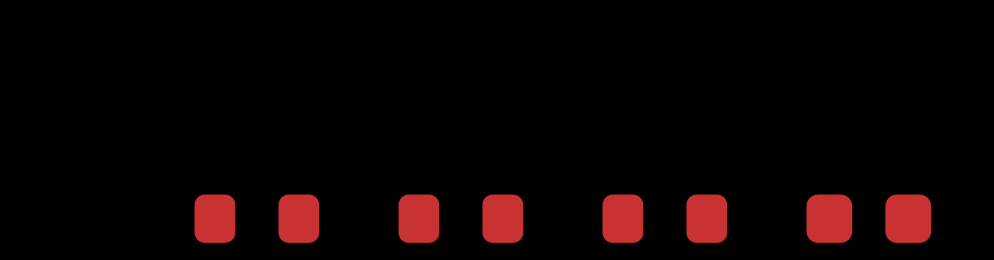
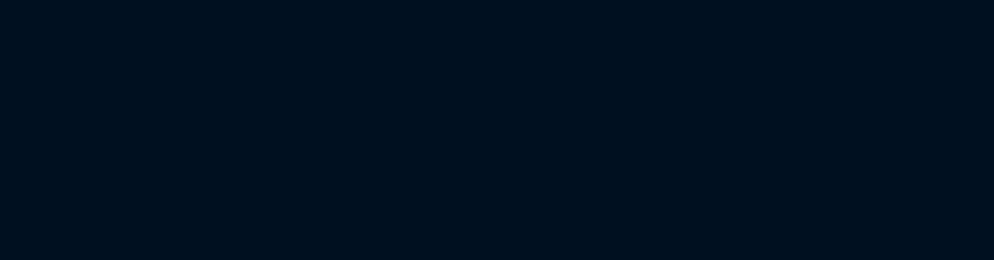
part: (256, 218) -> none
part: (460, 218) -> none
part: (664, 218) -> none
part: (868, 218) -> none

